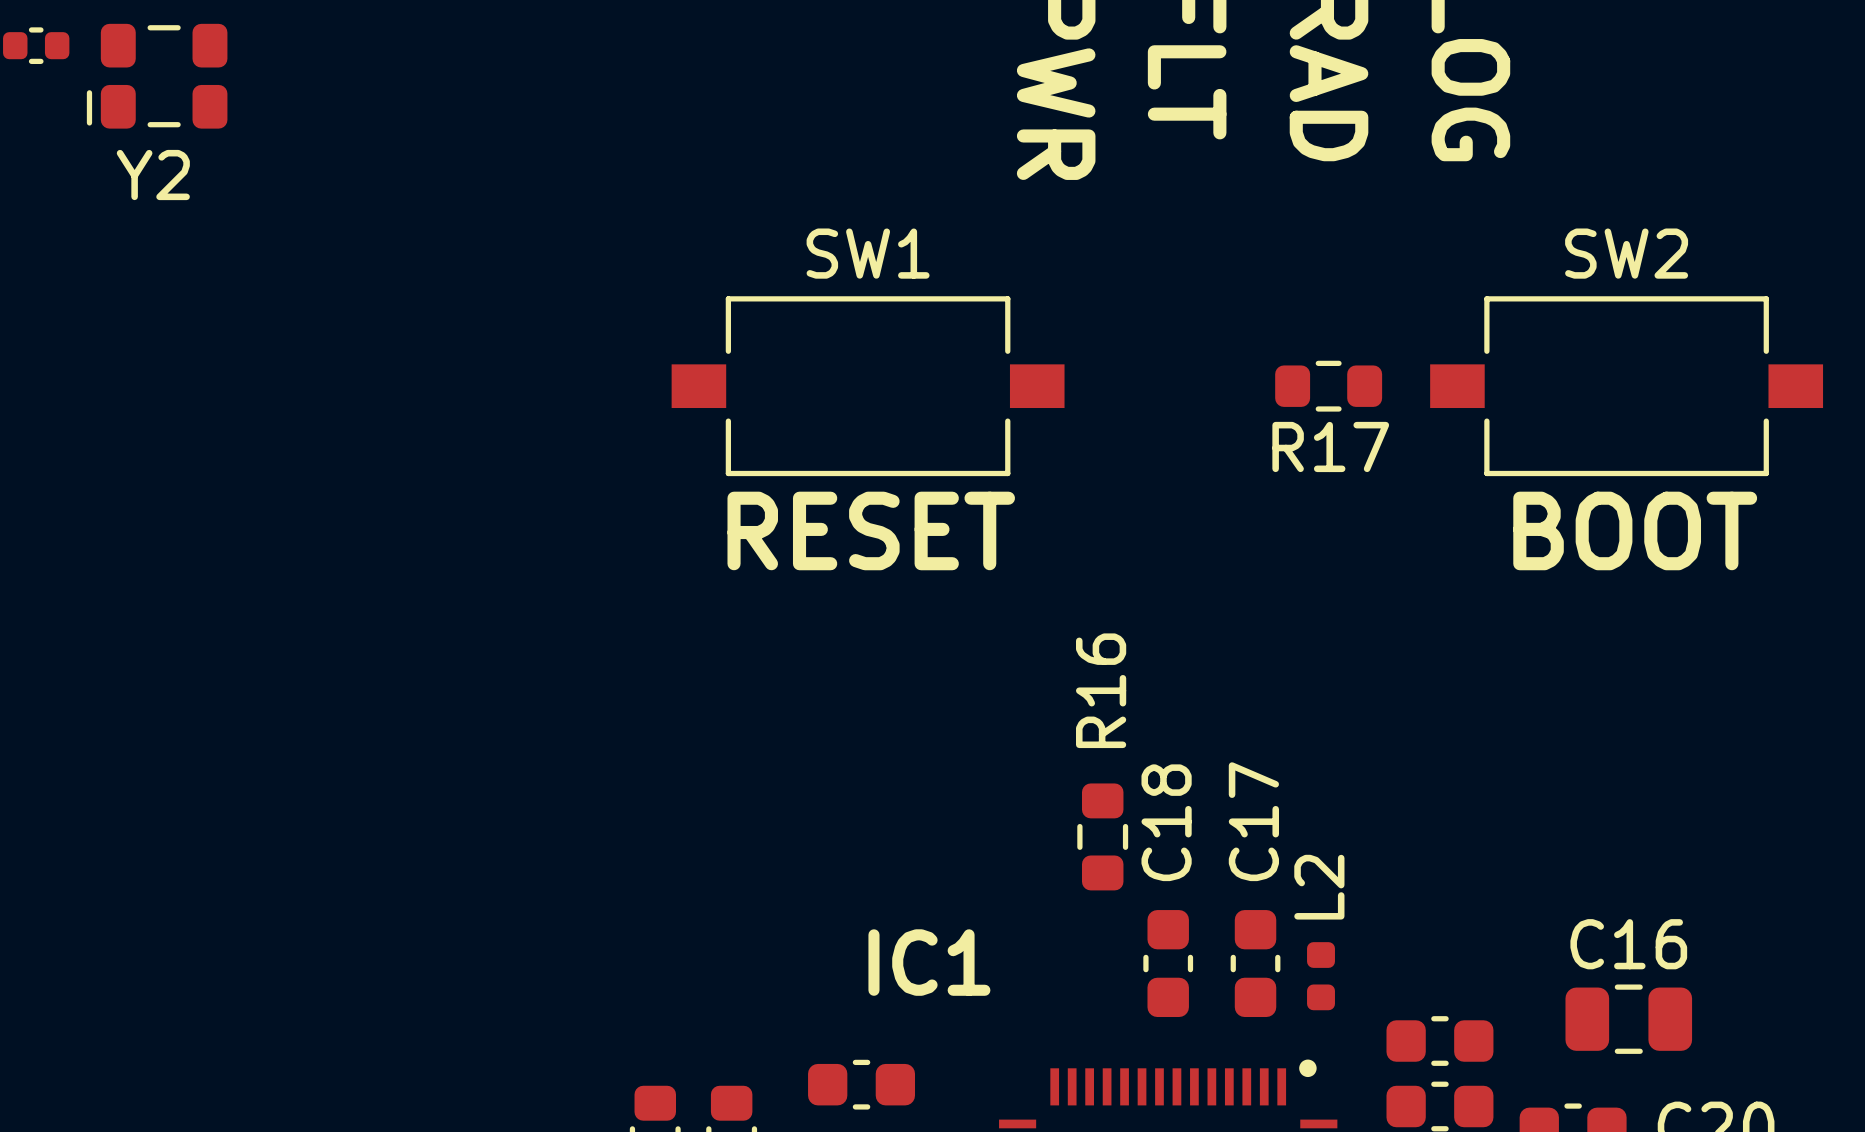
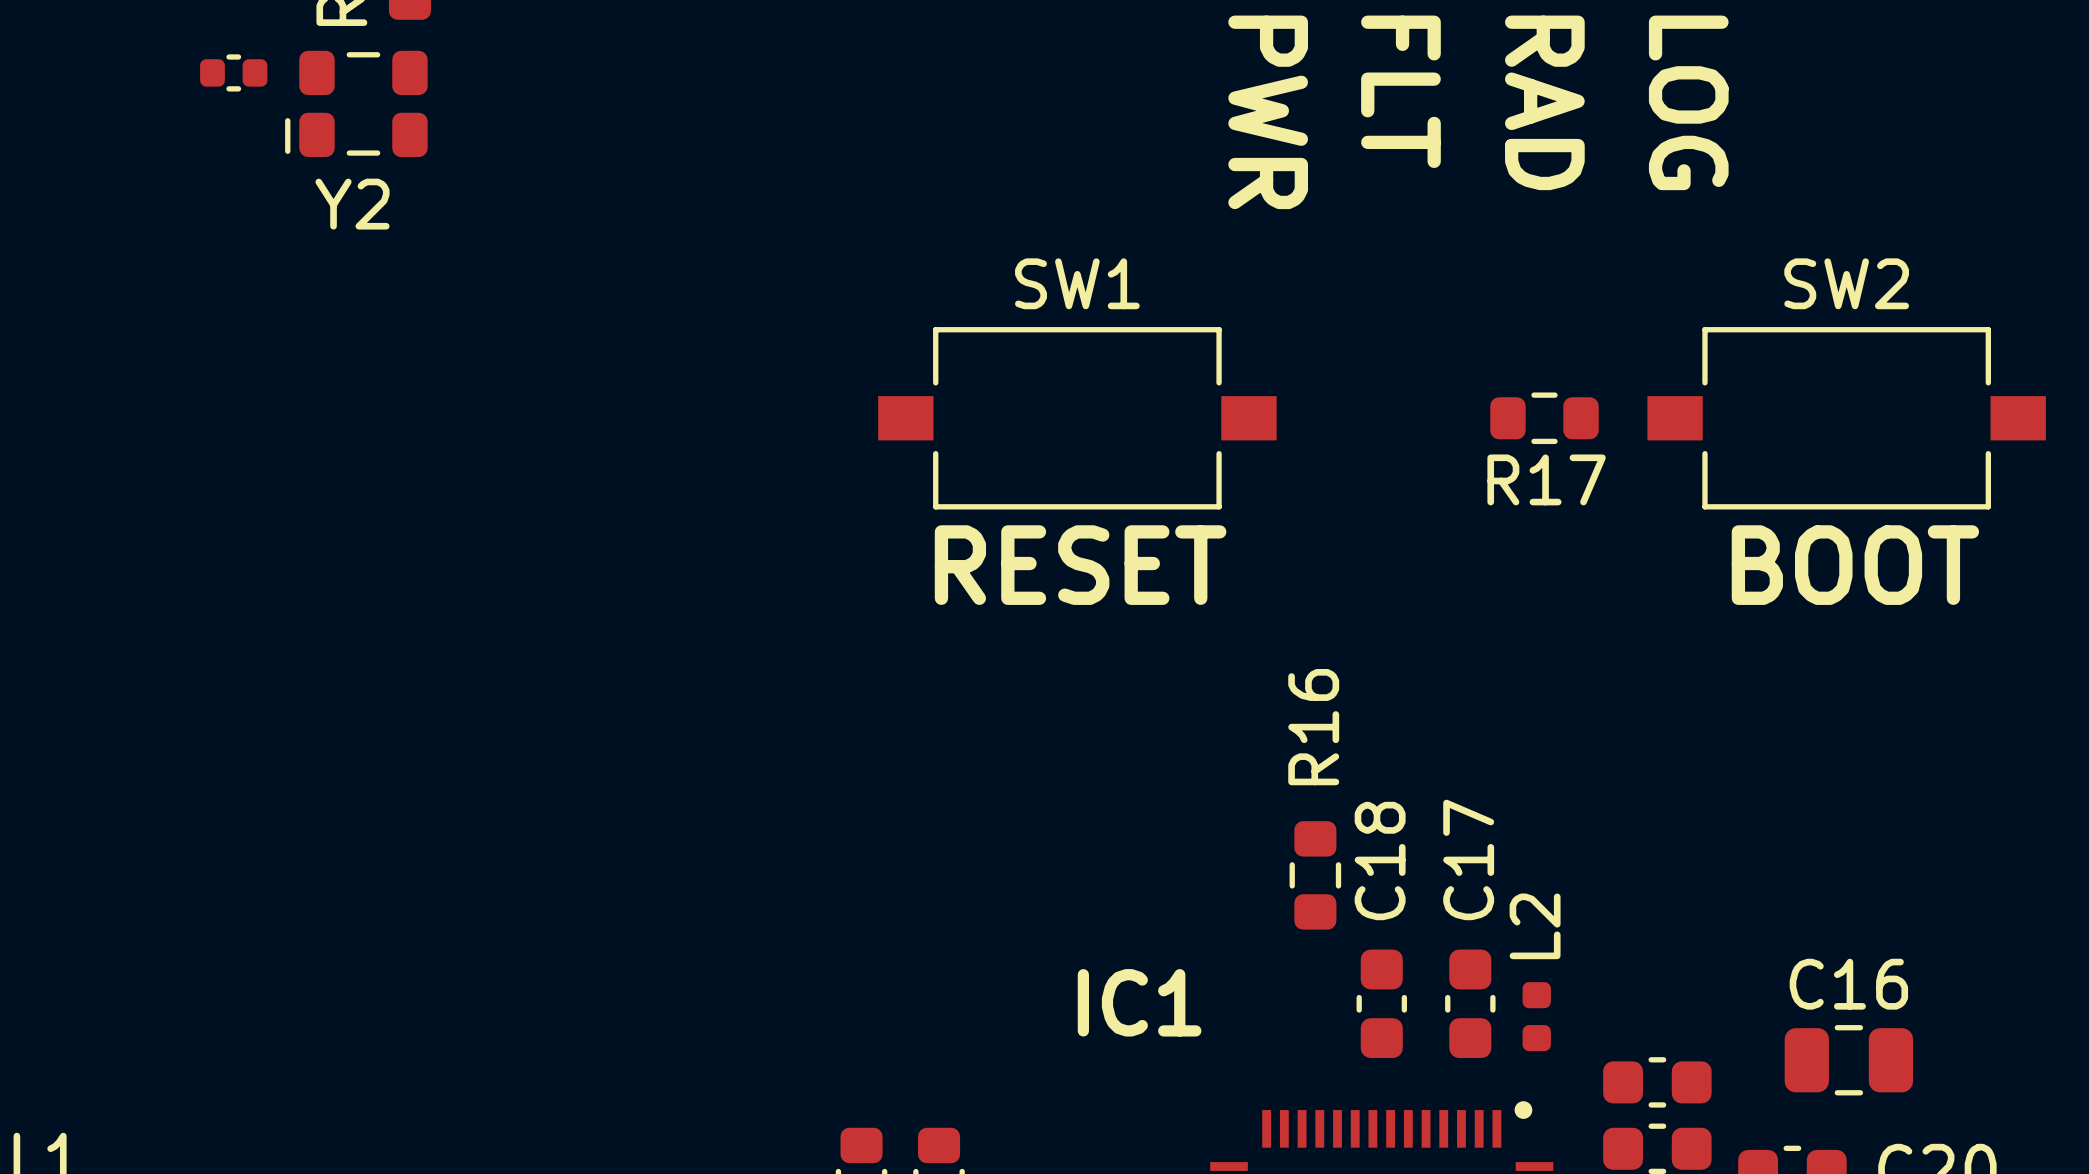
part: (861, 1084) -> none

